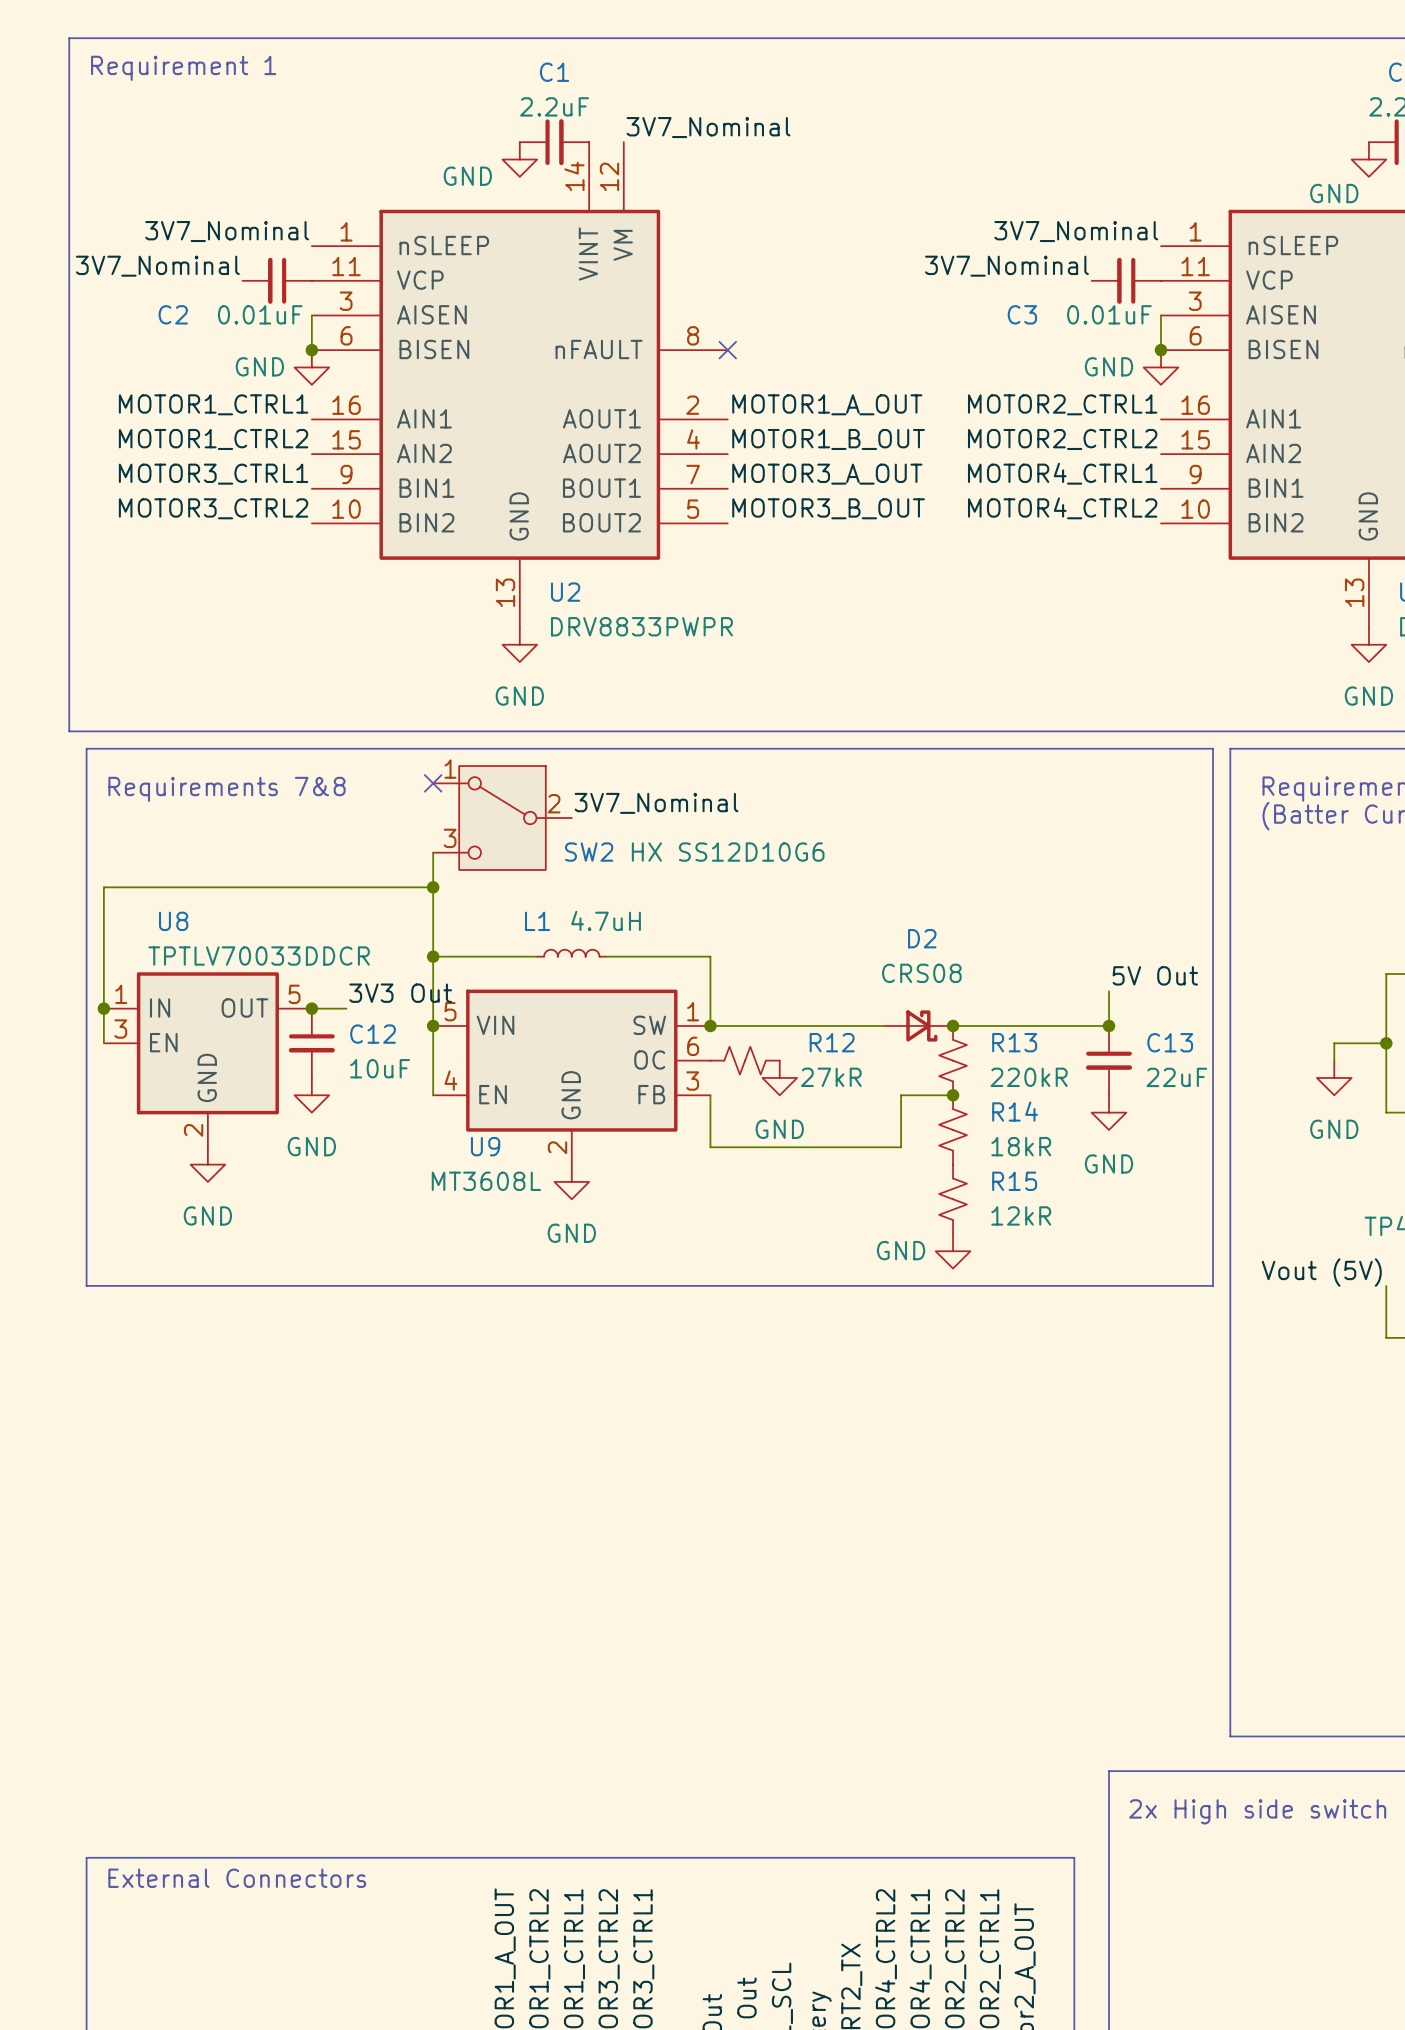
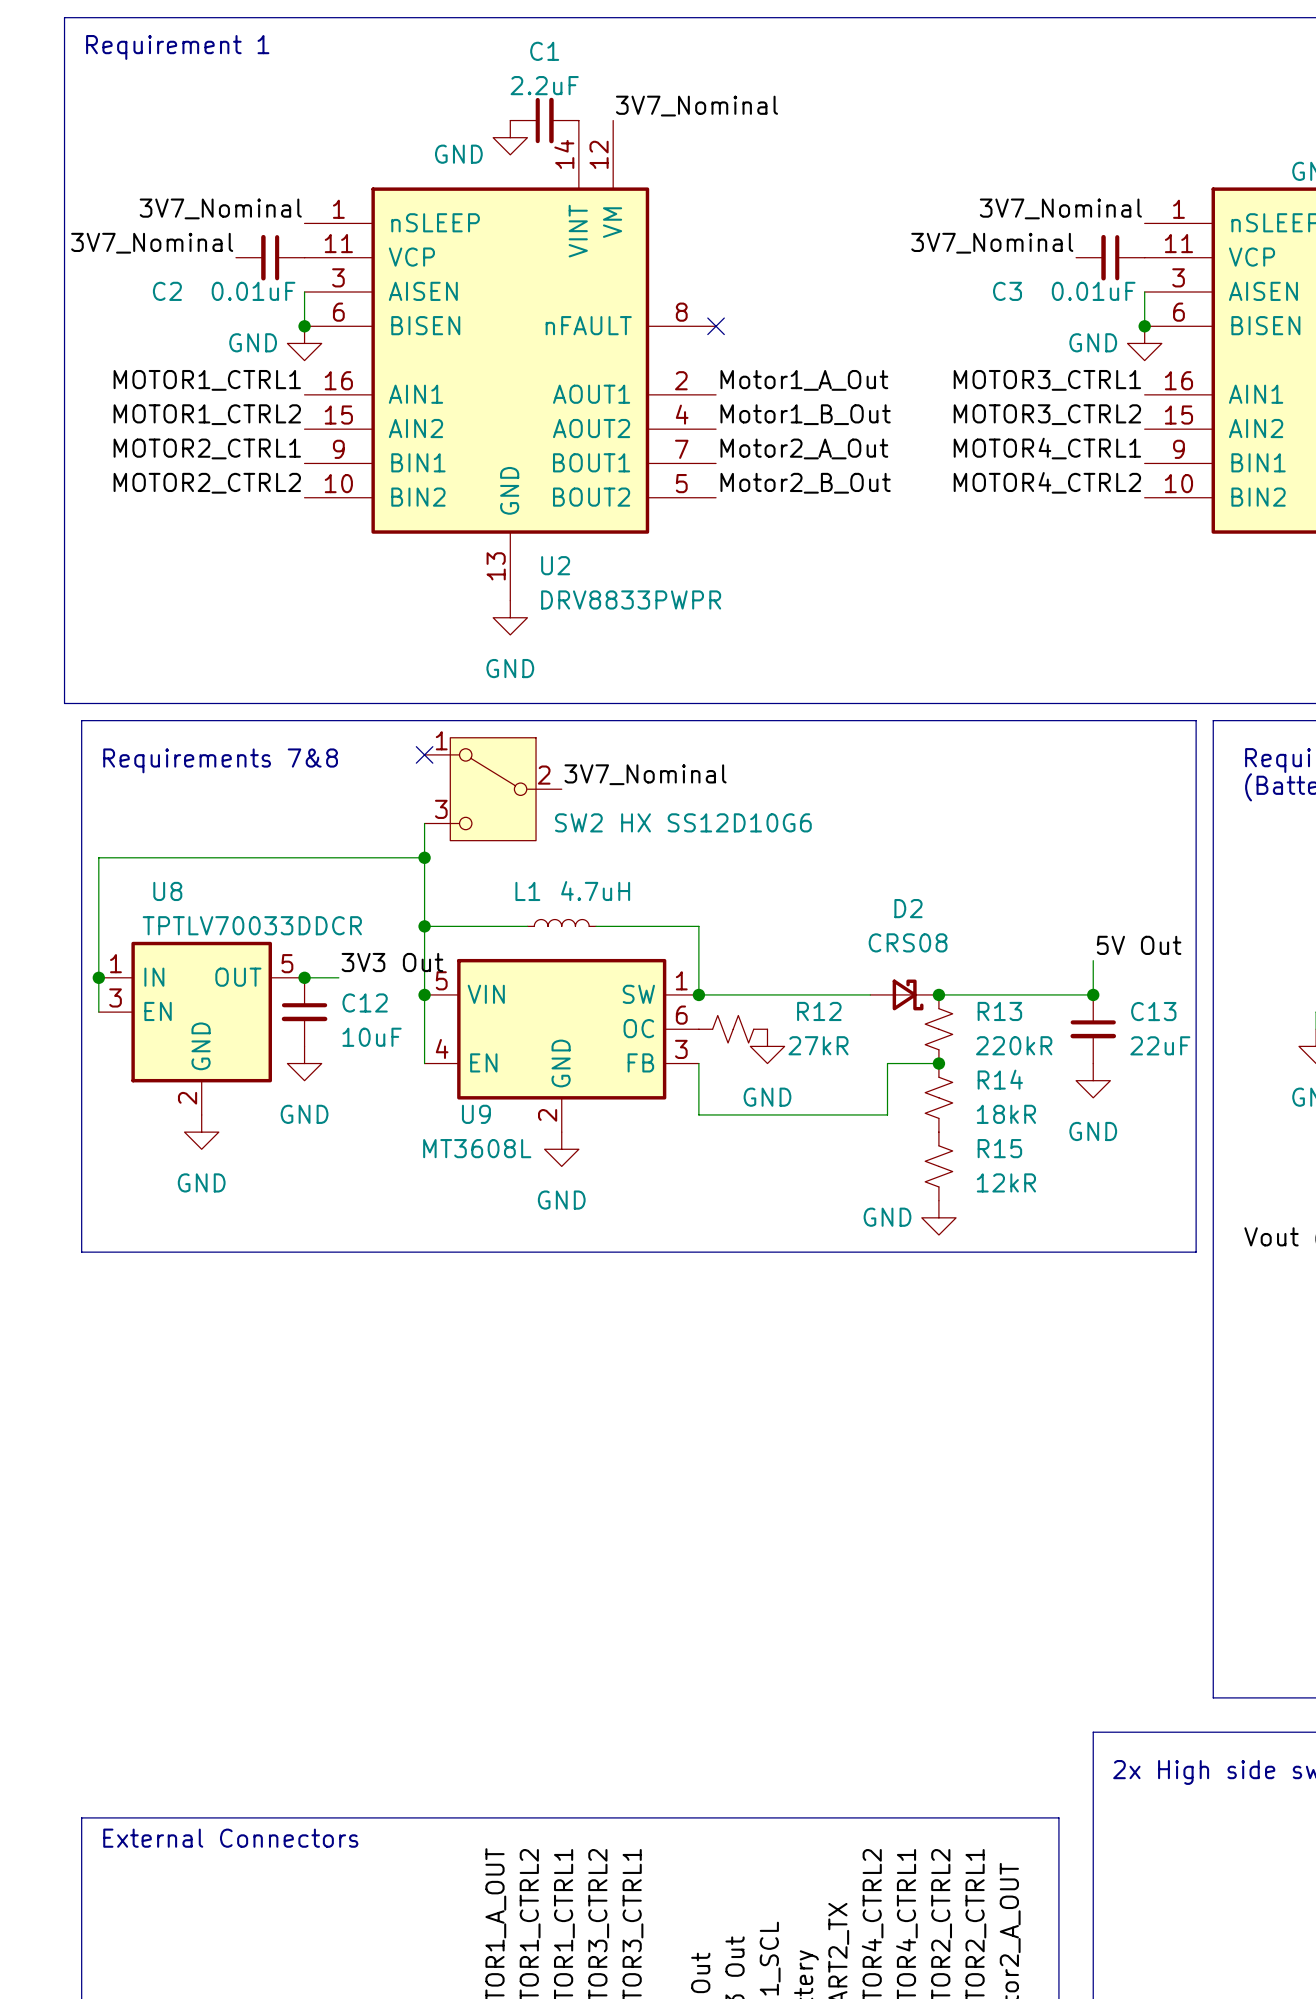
label: MOTOR1_A_OUT (827, 404) -> Motor1_A_Out (804, 380)
label: MOTOR2_CTRL1 (1062, 404) -> MOTOR3_CTRL1 (1047, 380)
label: MOTOR1_B_OUT (828, 439) -> Motor1_B_Out (805, 414)
label: MOTOR2_CTRL2 (1062, 439) -> MOTOR3_CTRL2 (1047, 414)
label: MOTOR3_CTRL1 (213, 474) -> MOTOR2_CTRL1 (207, 448)
label: MOTOR3_A_OUT (827, 474) -> Motor2_A_Out (804, 448)
label: MOTOR3_CTRL2 (213, 508) -> MOTOR2_CTRL2 (207, 483)
label: MOTOR3_B_OUT (828, 508) -> Motor2_B_Out (805, 483)

